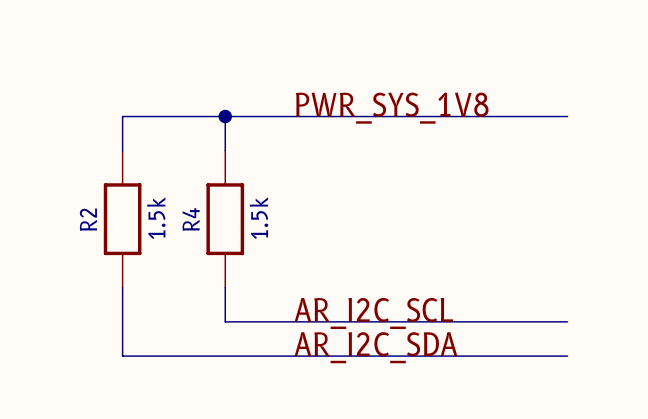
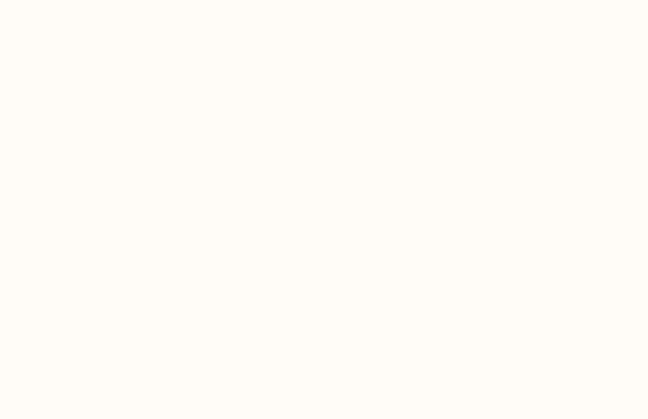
label: PWR_SYS_1V8 (392, 108) -> none
wire: (225, 116) (225, 150) -> none
junction: (225, 116) -> none
wire: (567, 116) (122, 116) (122, 150) -> none
R2: 1.5k (122, 219) -> none
R4: 1.5k (225, 219) -> none
wire: (122, 287) (122, 356) (567, 356) -> none
wire: (225, 287) (225, 321) (567, 321) -> none
label: AR_I2C_SCL (373, 313) -> none
label: AR_I2C_SDA (375, 347) -> none

